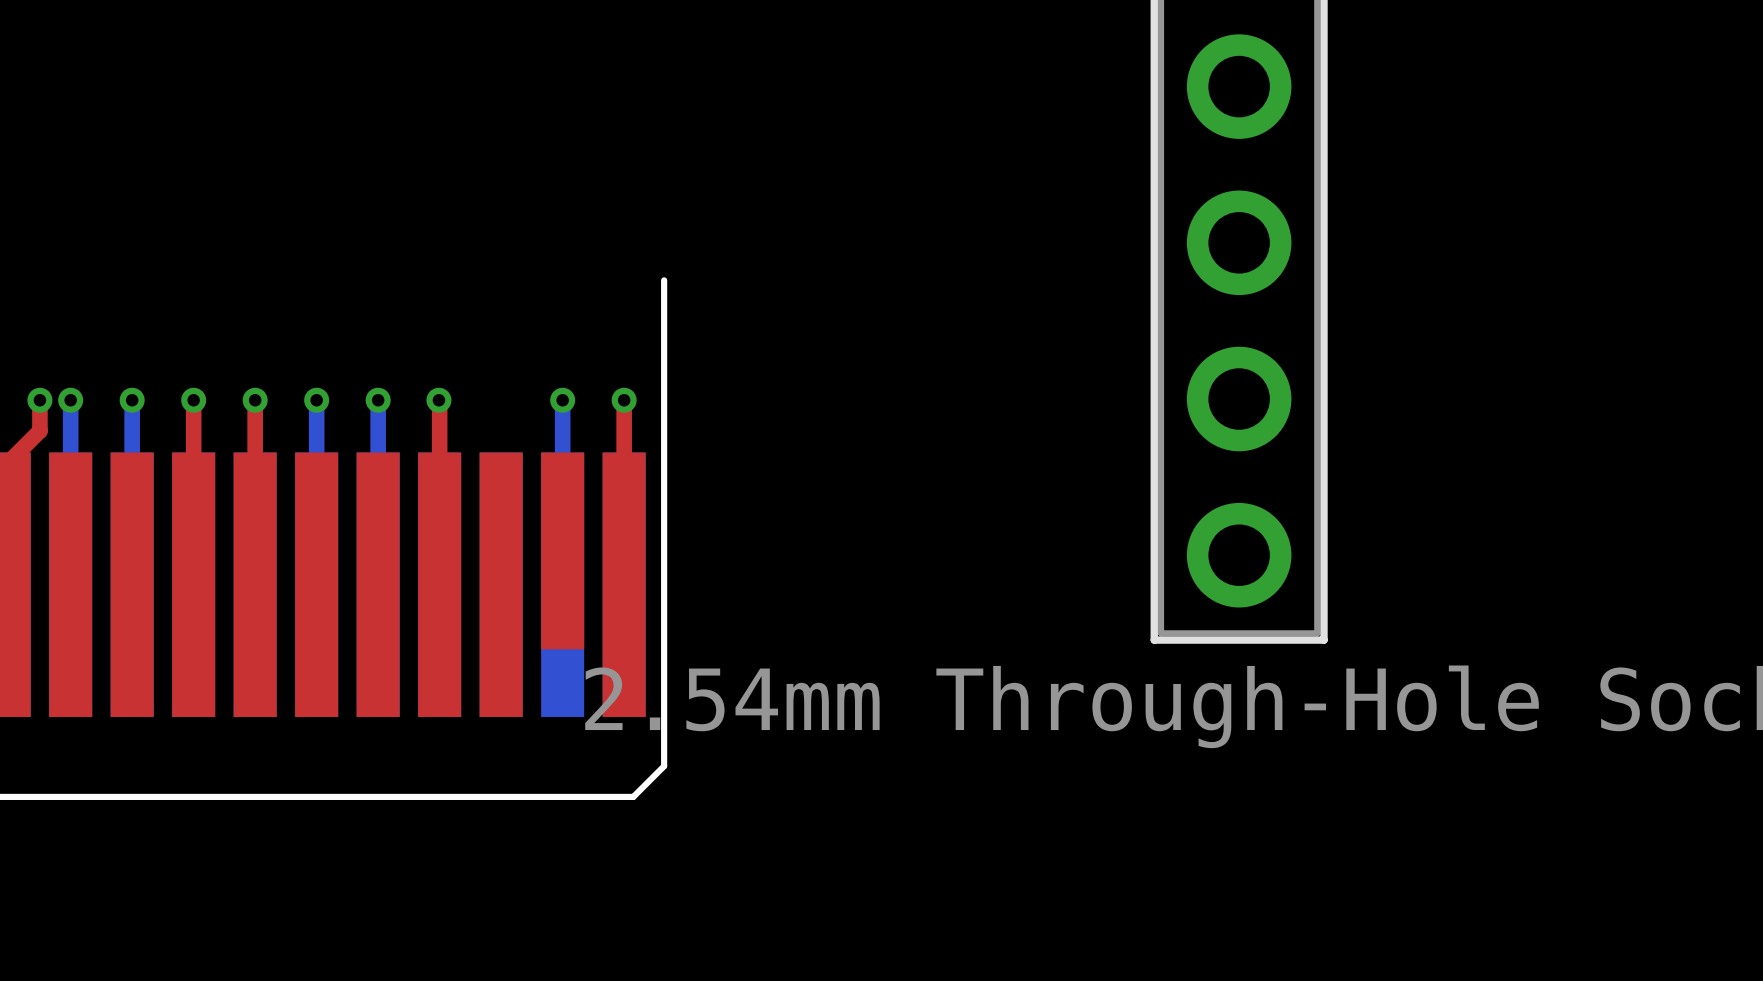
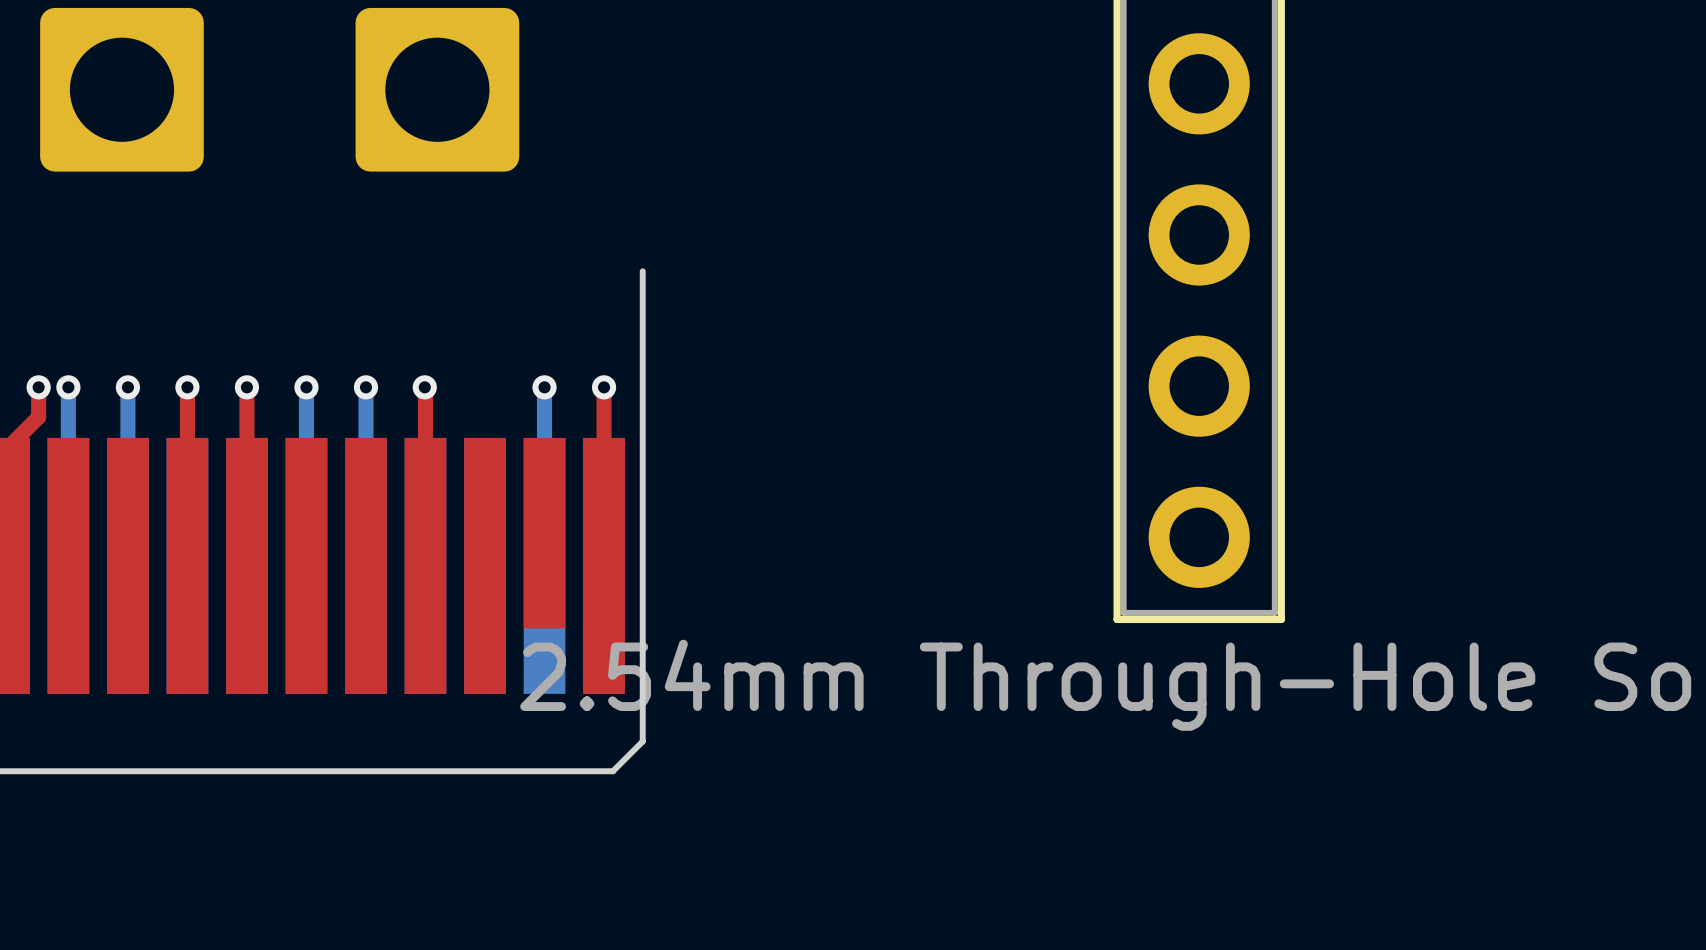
part: none -> (121, 89)
part: none -> (437, 89)

